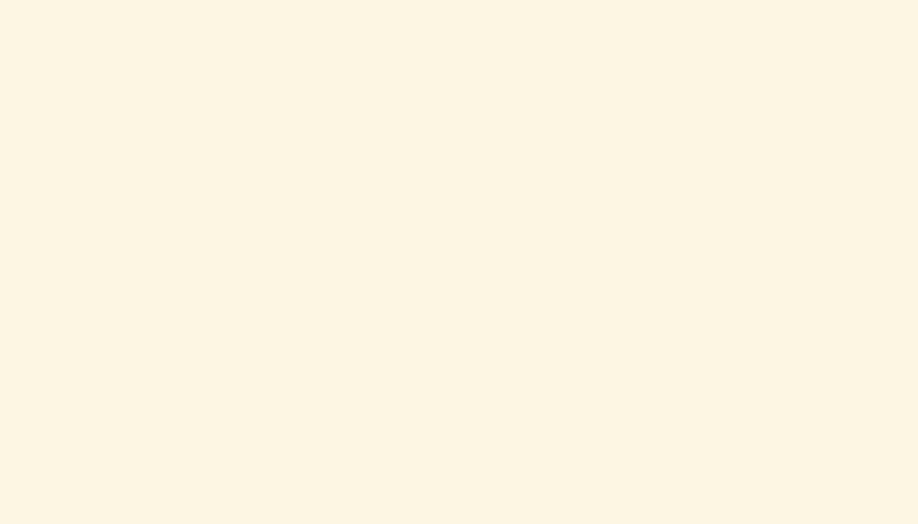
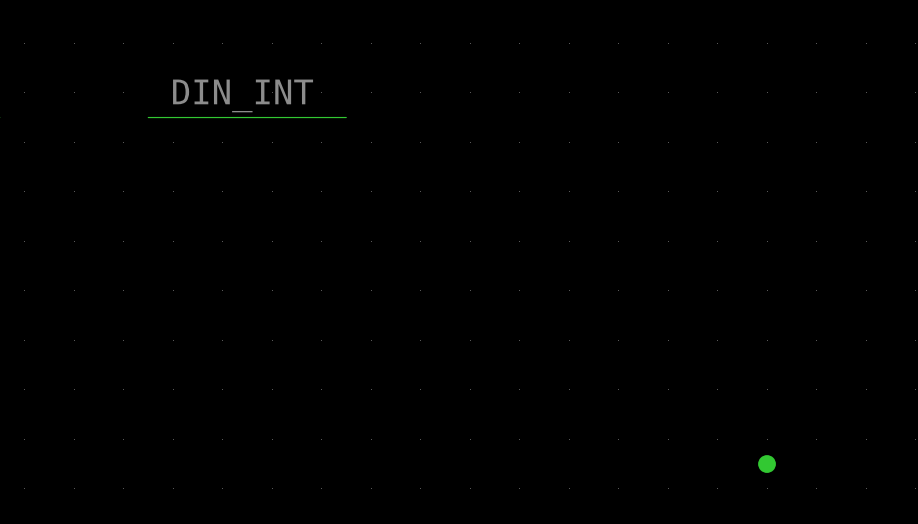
text: none -> DIN_INT (243, 95)
wire: none -> (148, 117) (346, 117)
junction: none -> (767, 464)

